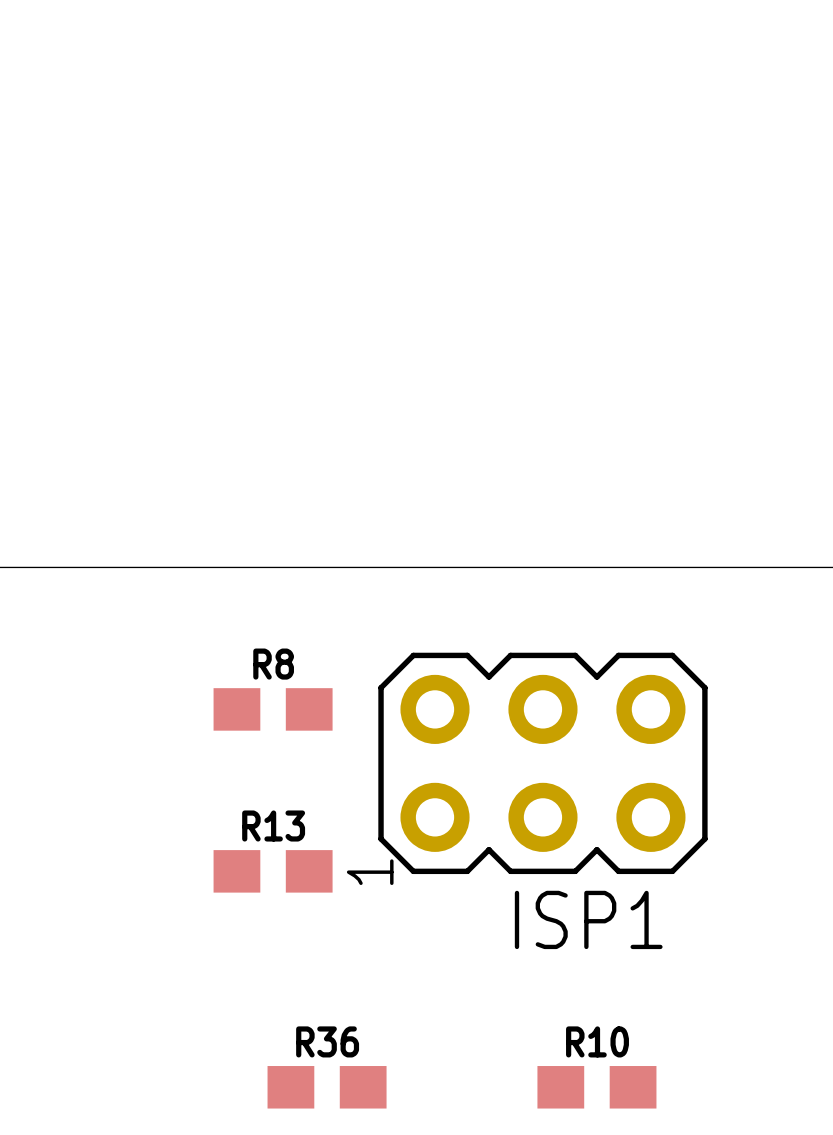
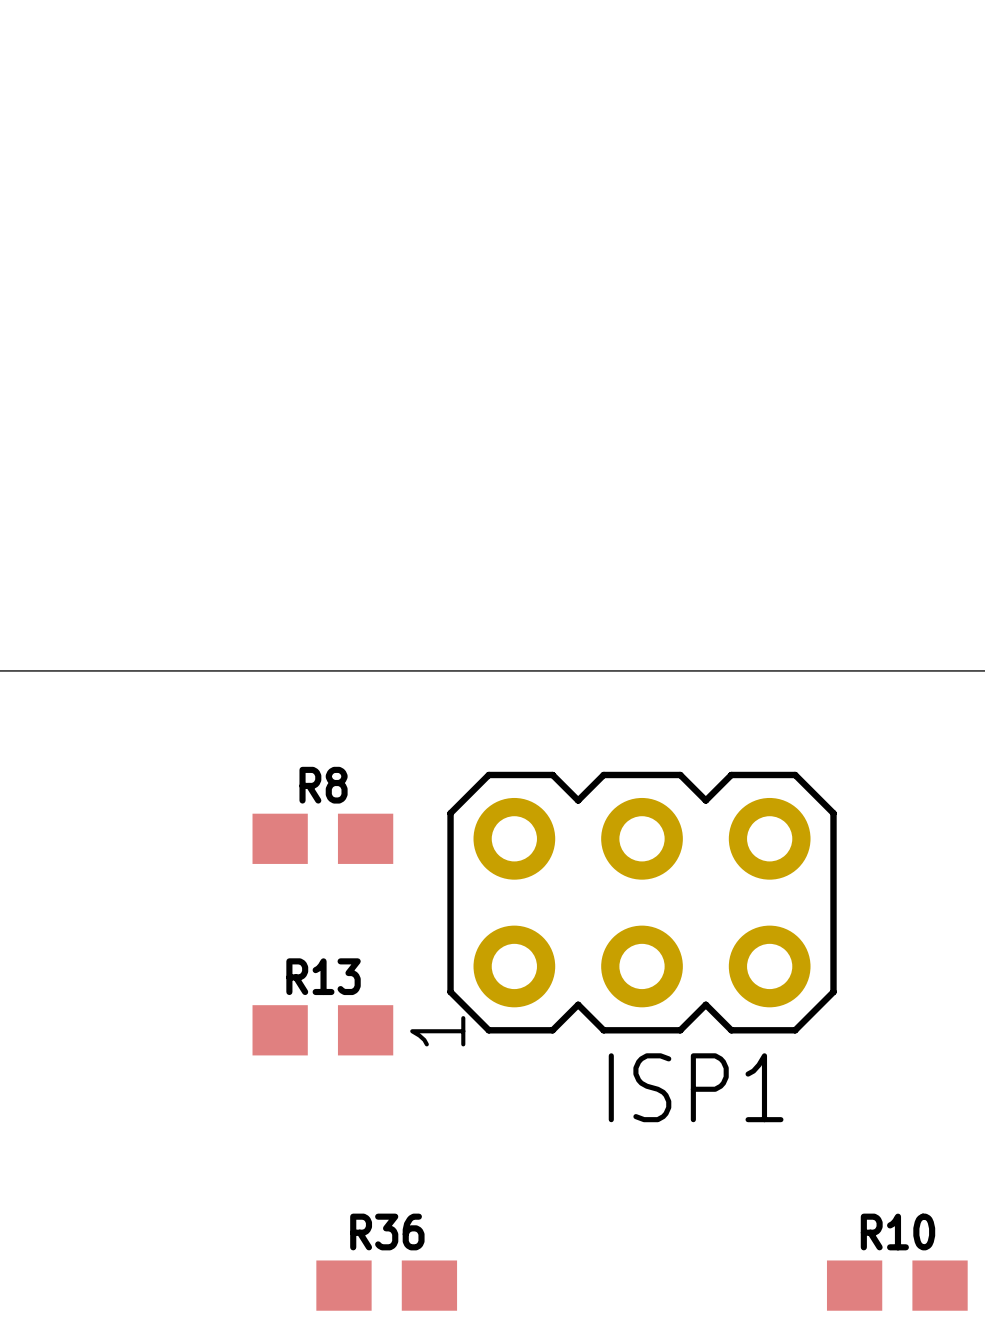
R10 position: (596, 1087) -> (897, 1285)

